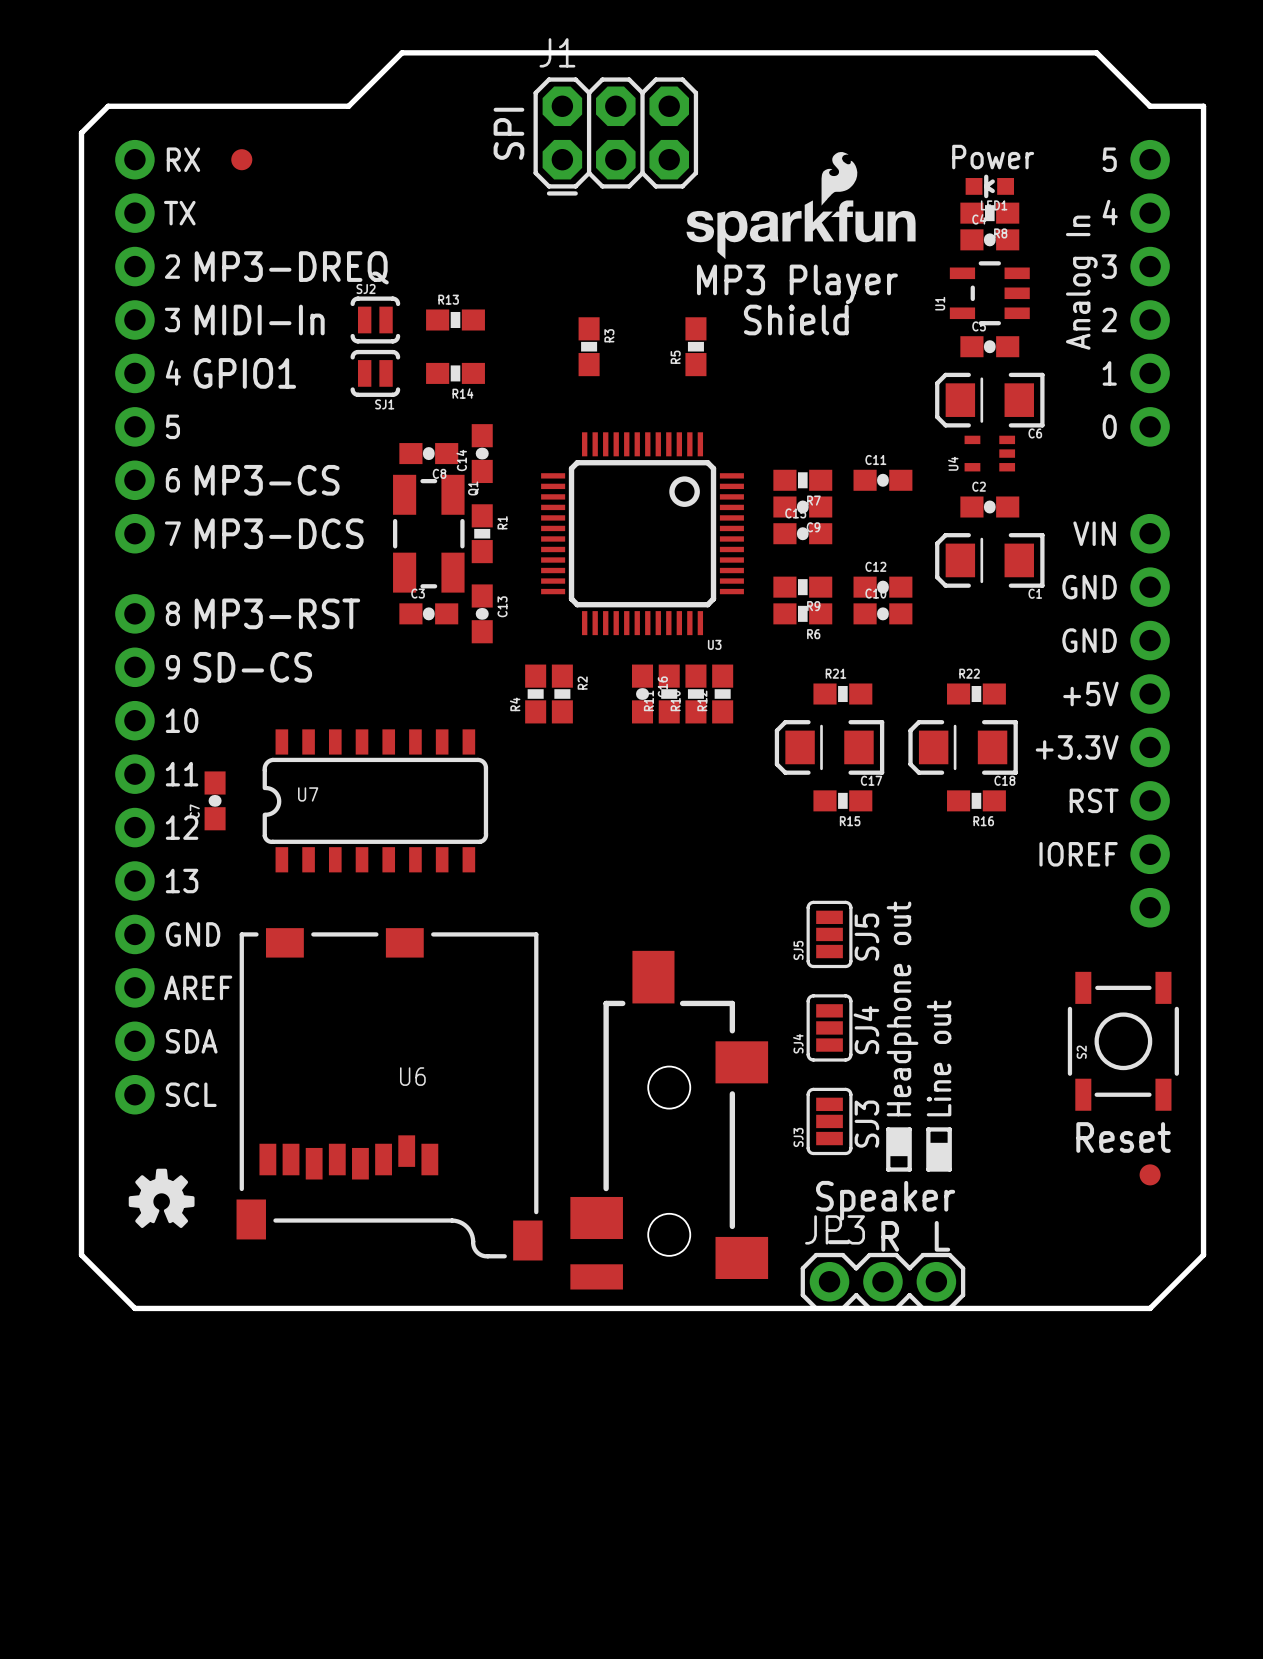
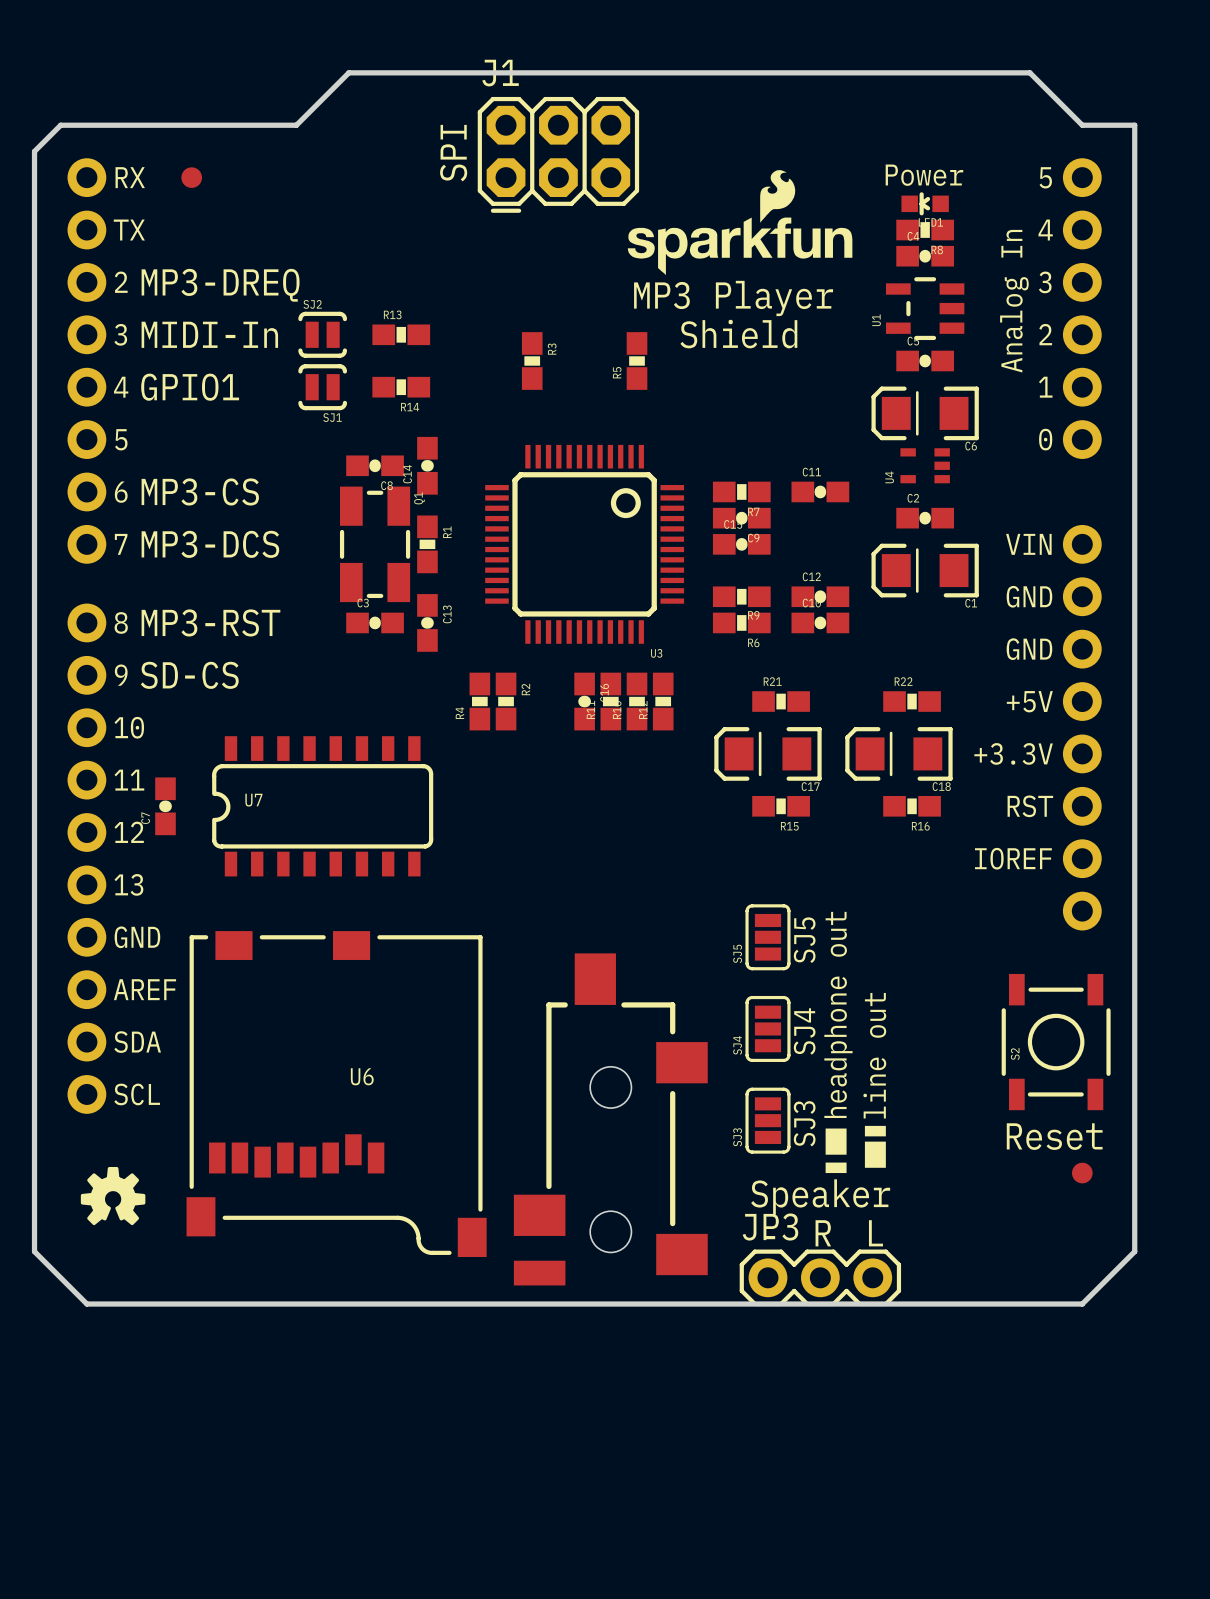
text: Headphone out (902, 1008) -> headphone out (838, 1014)
text: Line out (939, 1058) -> line out (874, 1055)
drawing: none -> [864, 1125, 886, 1137]
line: (888, 1129) (888, 1169) (909, 1169) (909, 1129) (888, 1129) -> none
line: (928, 1129) (949, 1129) (949, 1169) (928, 1169) (928, 1129) -> none
drawing: none -> [825, 1162, 847, 1174]

